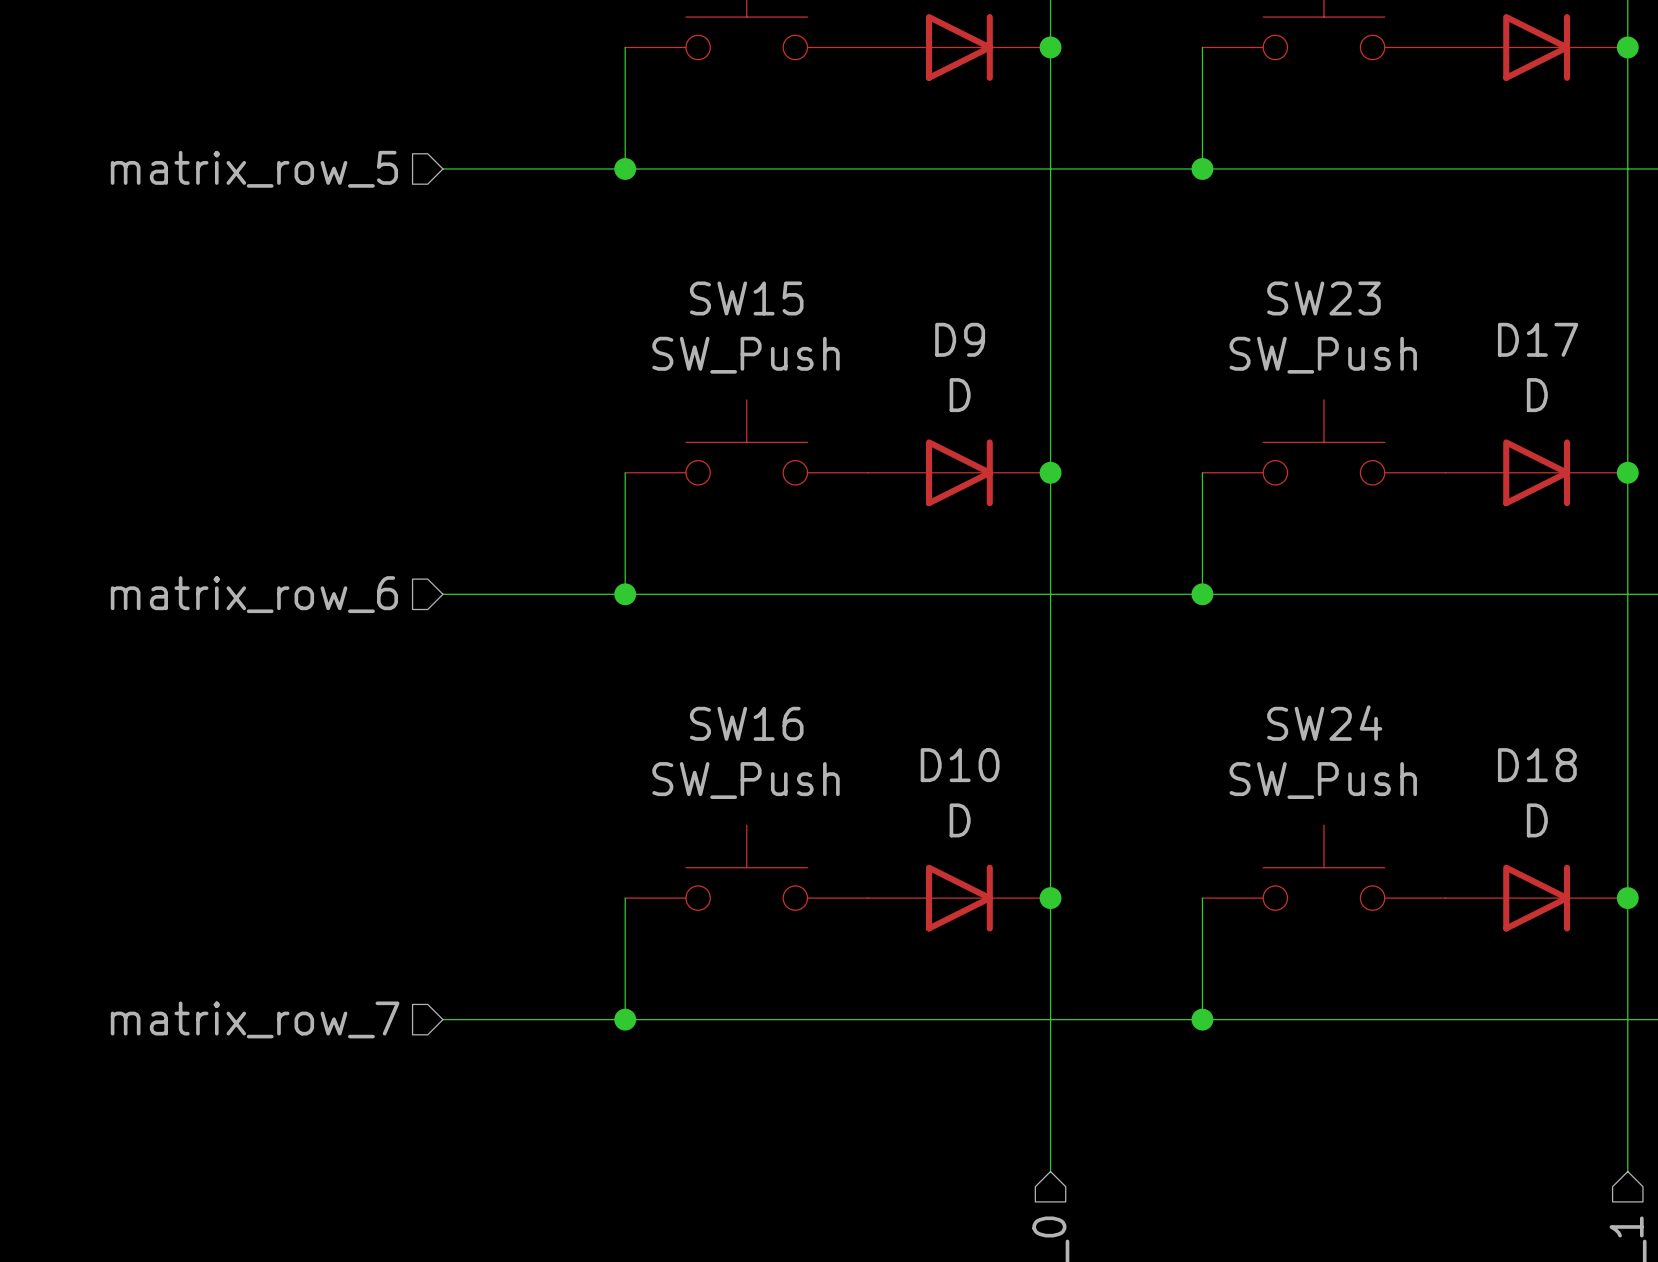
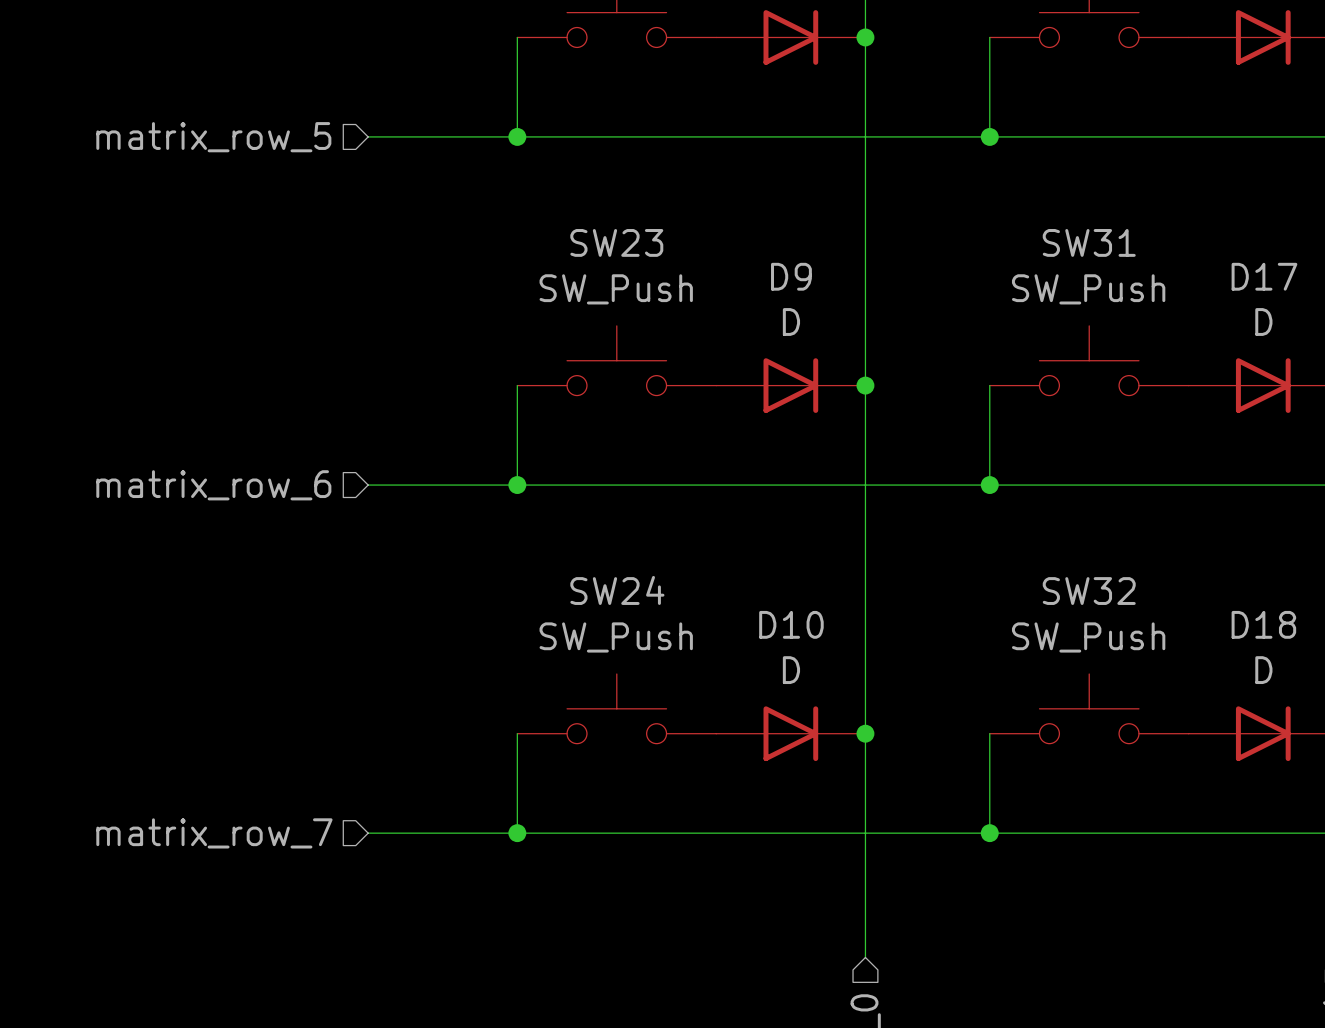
SW15 name: SW15 (746, 298) -> SW23 (616, 242)
SW23 name: SW23 (1323, 298) -> SW31 (1089, 242)
SW16 name: SW16 (746, 723) -> SW24 (617, 590)
SW24 name: SW24 (1324, 723) -> SW32 (1089, 591)

